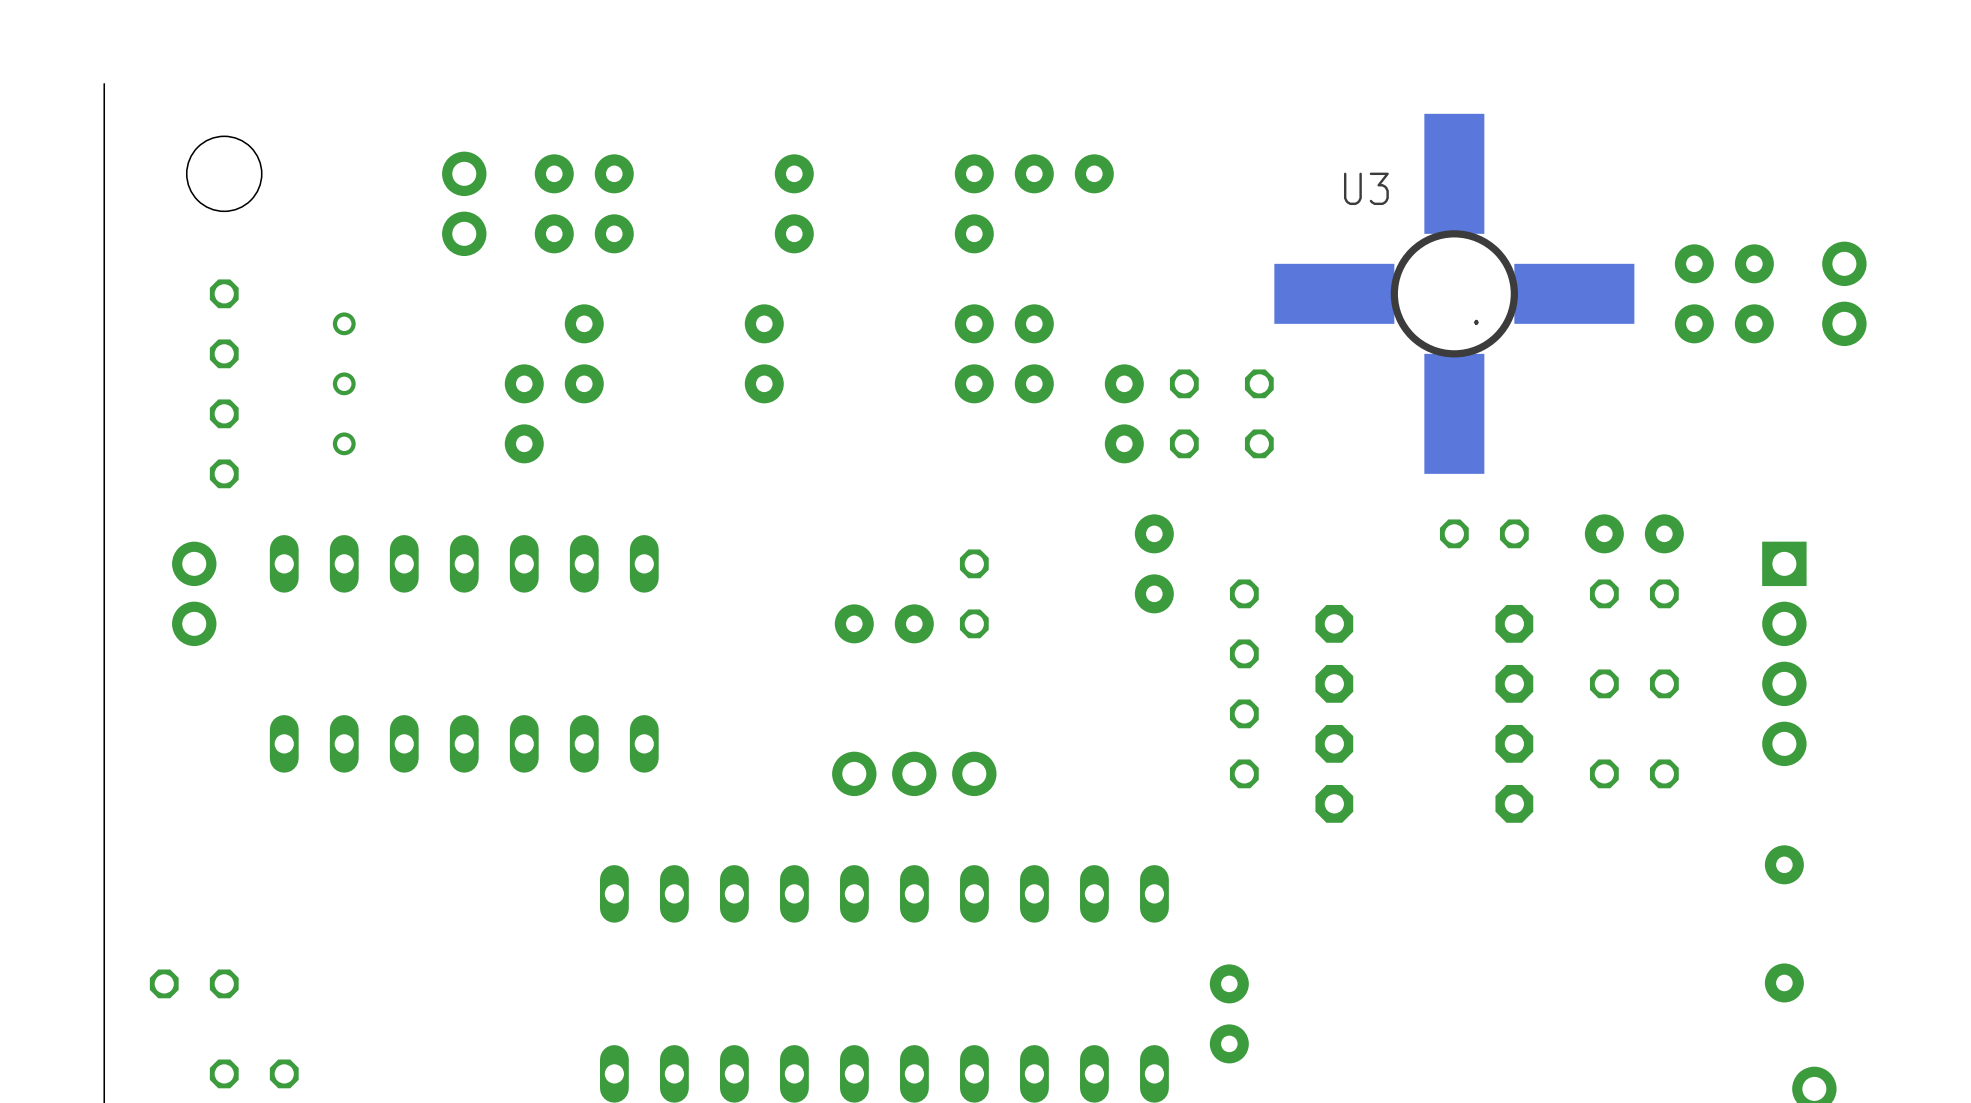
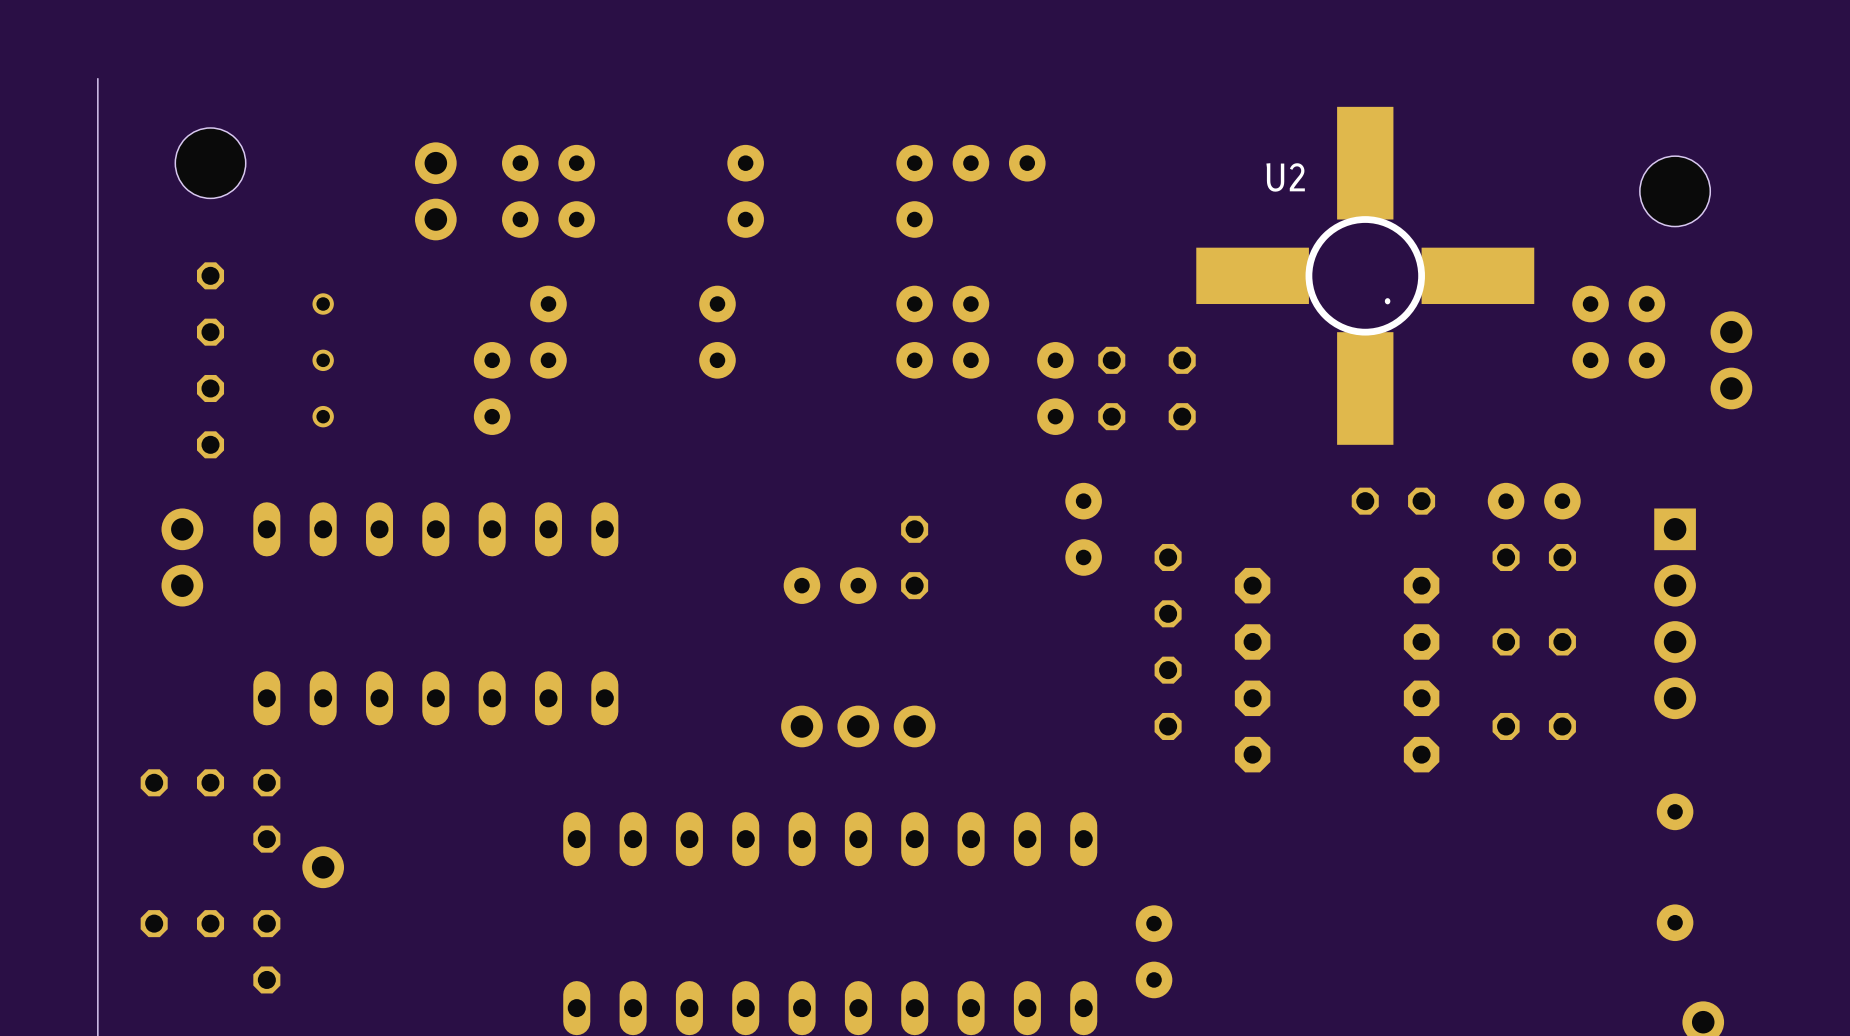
U3 name: U3 (1366, 188) -> U2 (1285, 177)
hole: none -> (1675, 191)
part position: (1724, 263) -> (1618, 360)
part position: (1844, 293) -> (1731, 360)
part: none -> (182, 782)
part: none -> (266, 810)
part: none -> (323, 867)
part: none -> (266, 951)
part: (254, 1073) -> none

